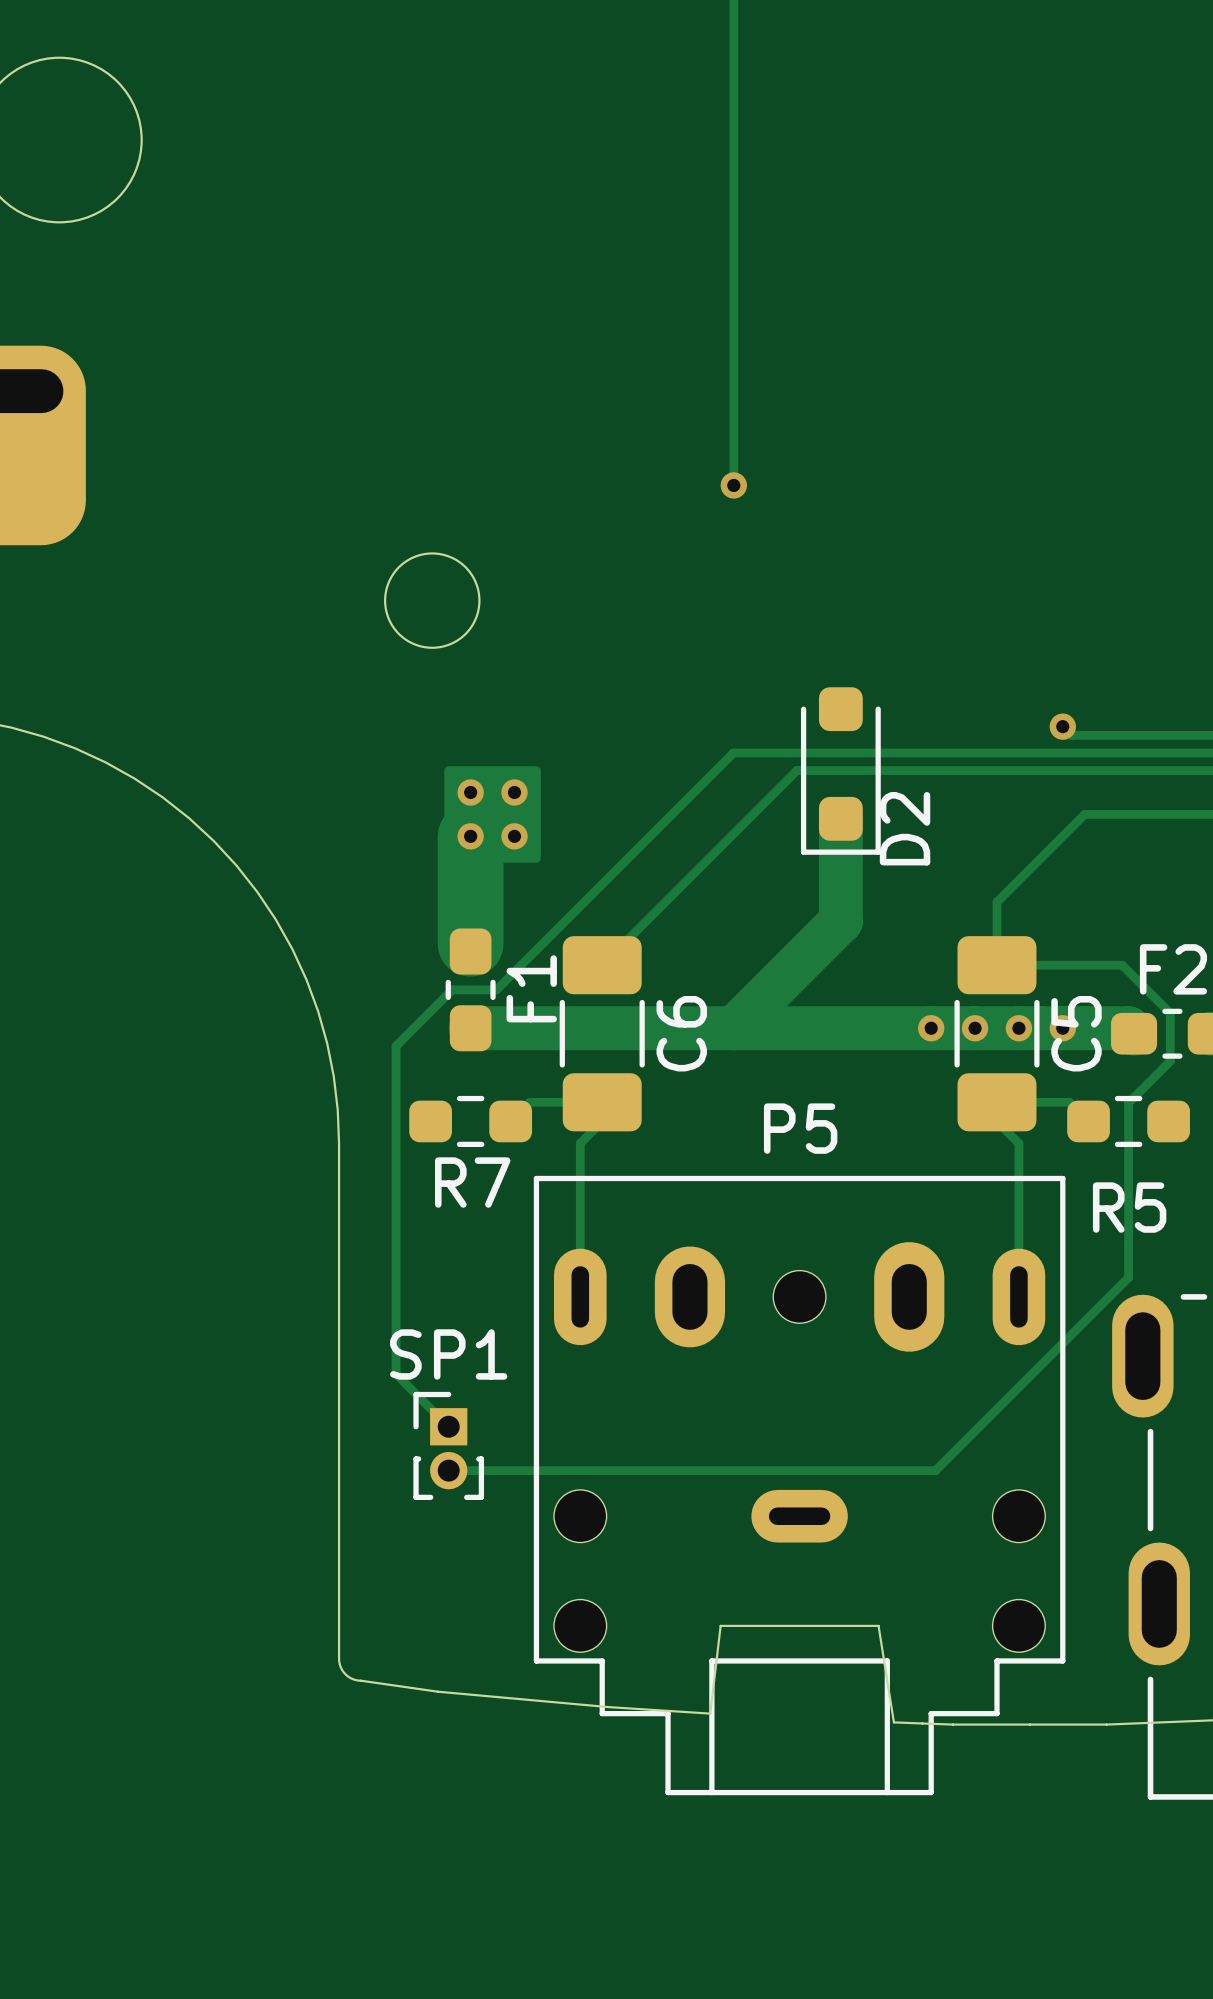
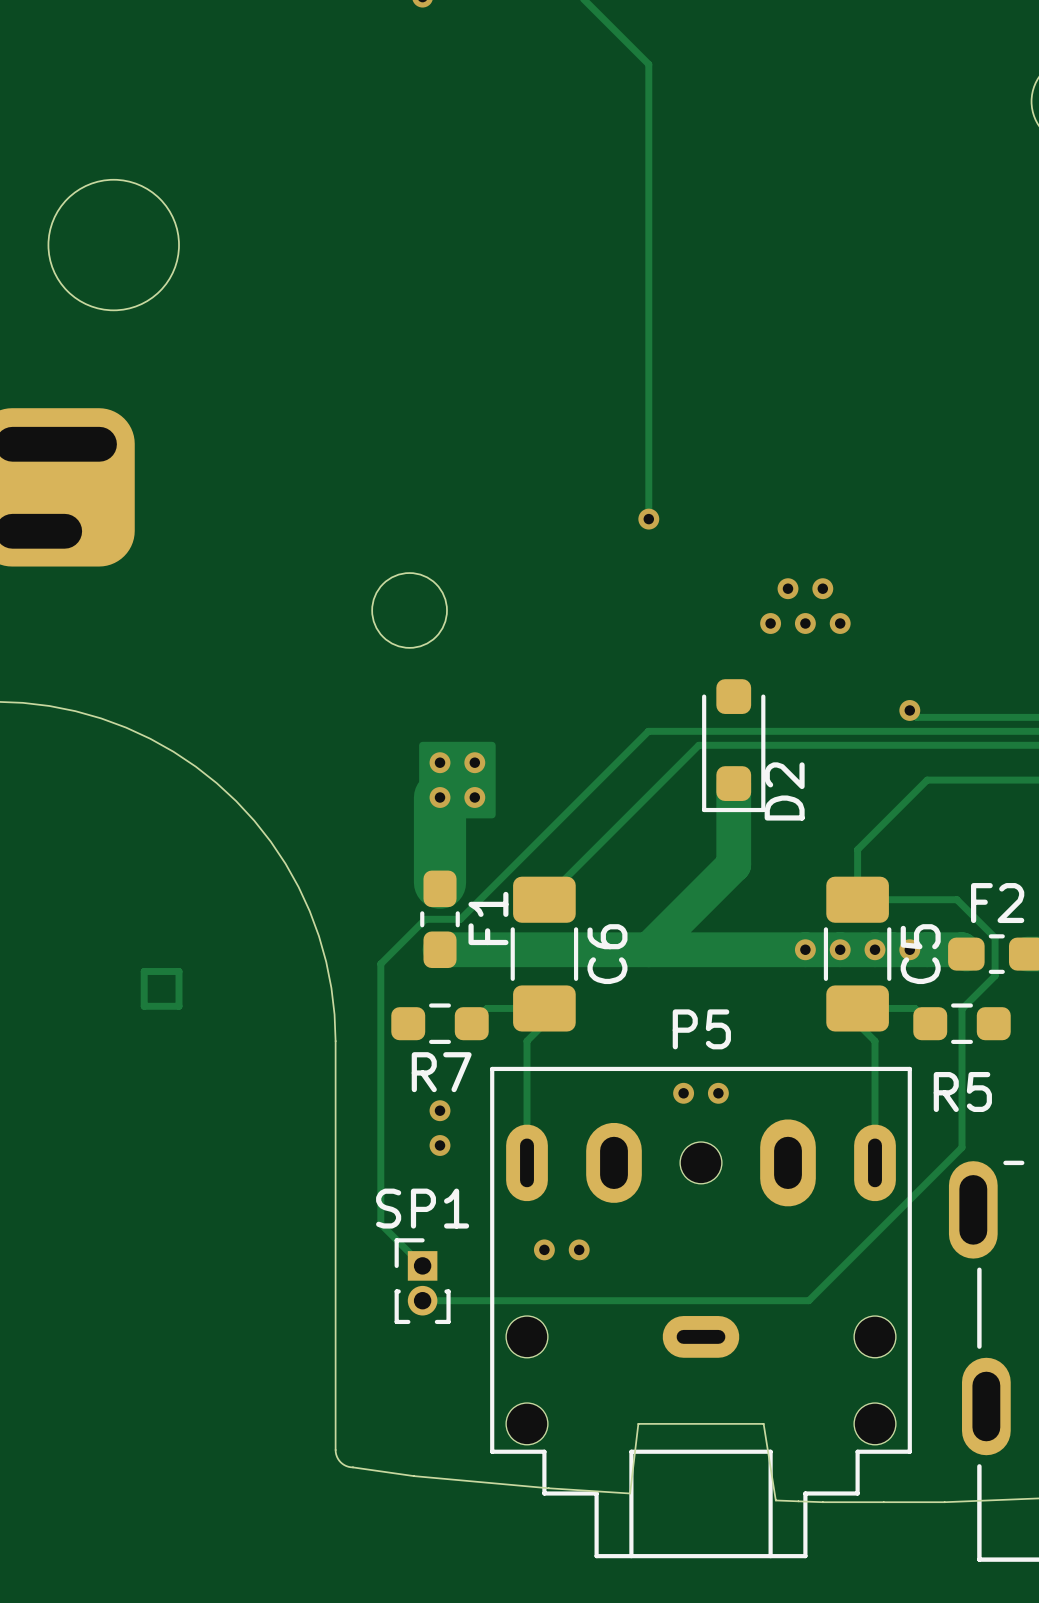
via: none -> (788, 588)
via: none -> (822, 588)
via: none -> (770, 623)
via: none -> (805, 623)
via: none -> (840, 623)
track: none -> (144, 971) (179, 971) (179, 1006) (144, 1006) (144, 971)
via: none -> (683, 1093)
via: none -> (718, 1093)
via: none -> (440, 1110)
via: none -> (440, 1145)
via: none -> (544, 1249)
via: none -> (579, 1249)

